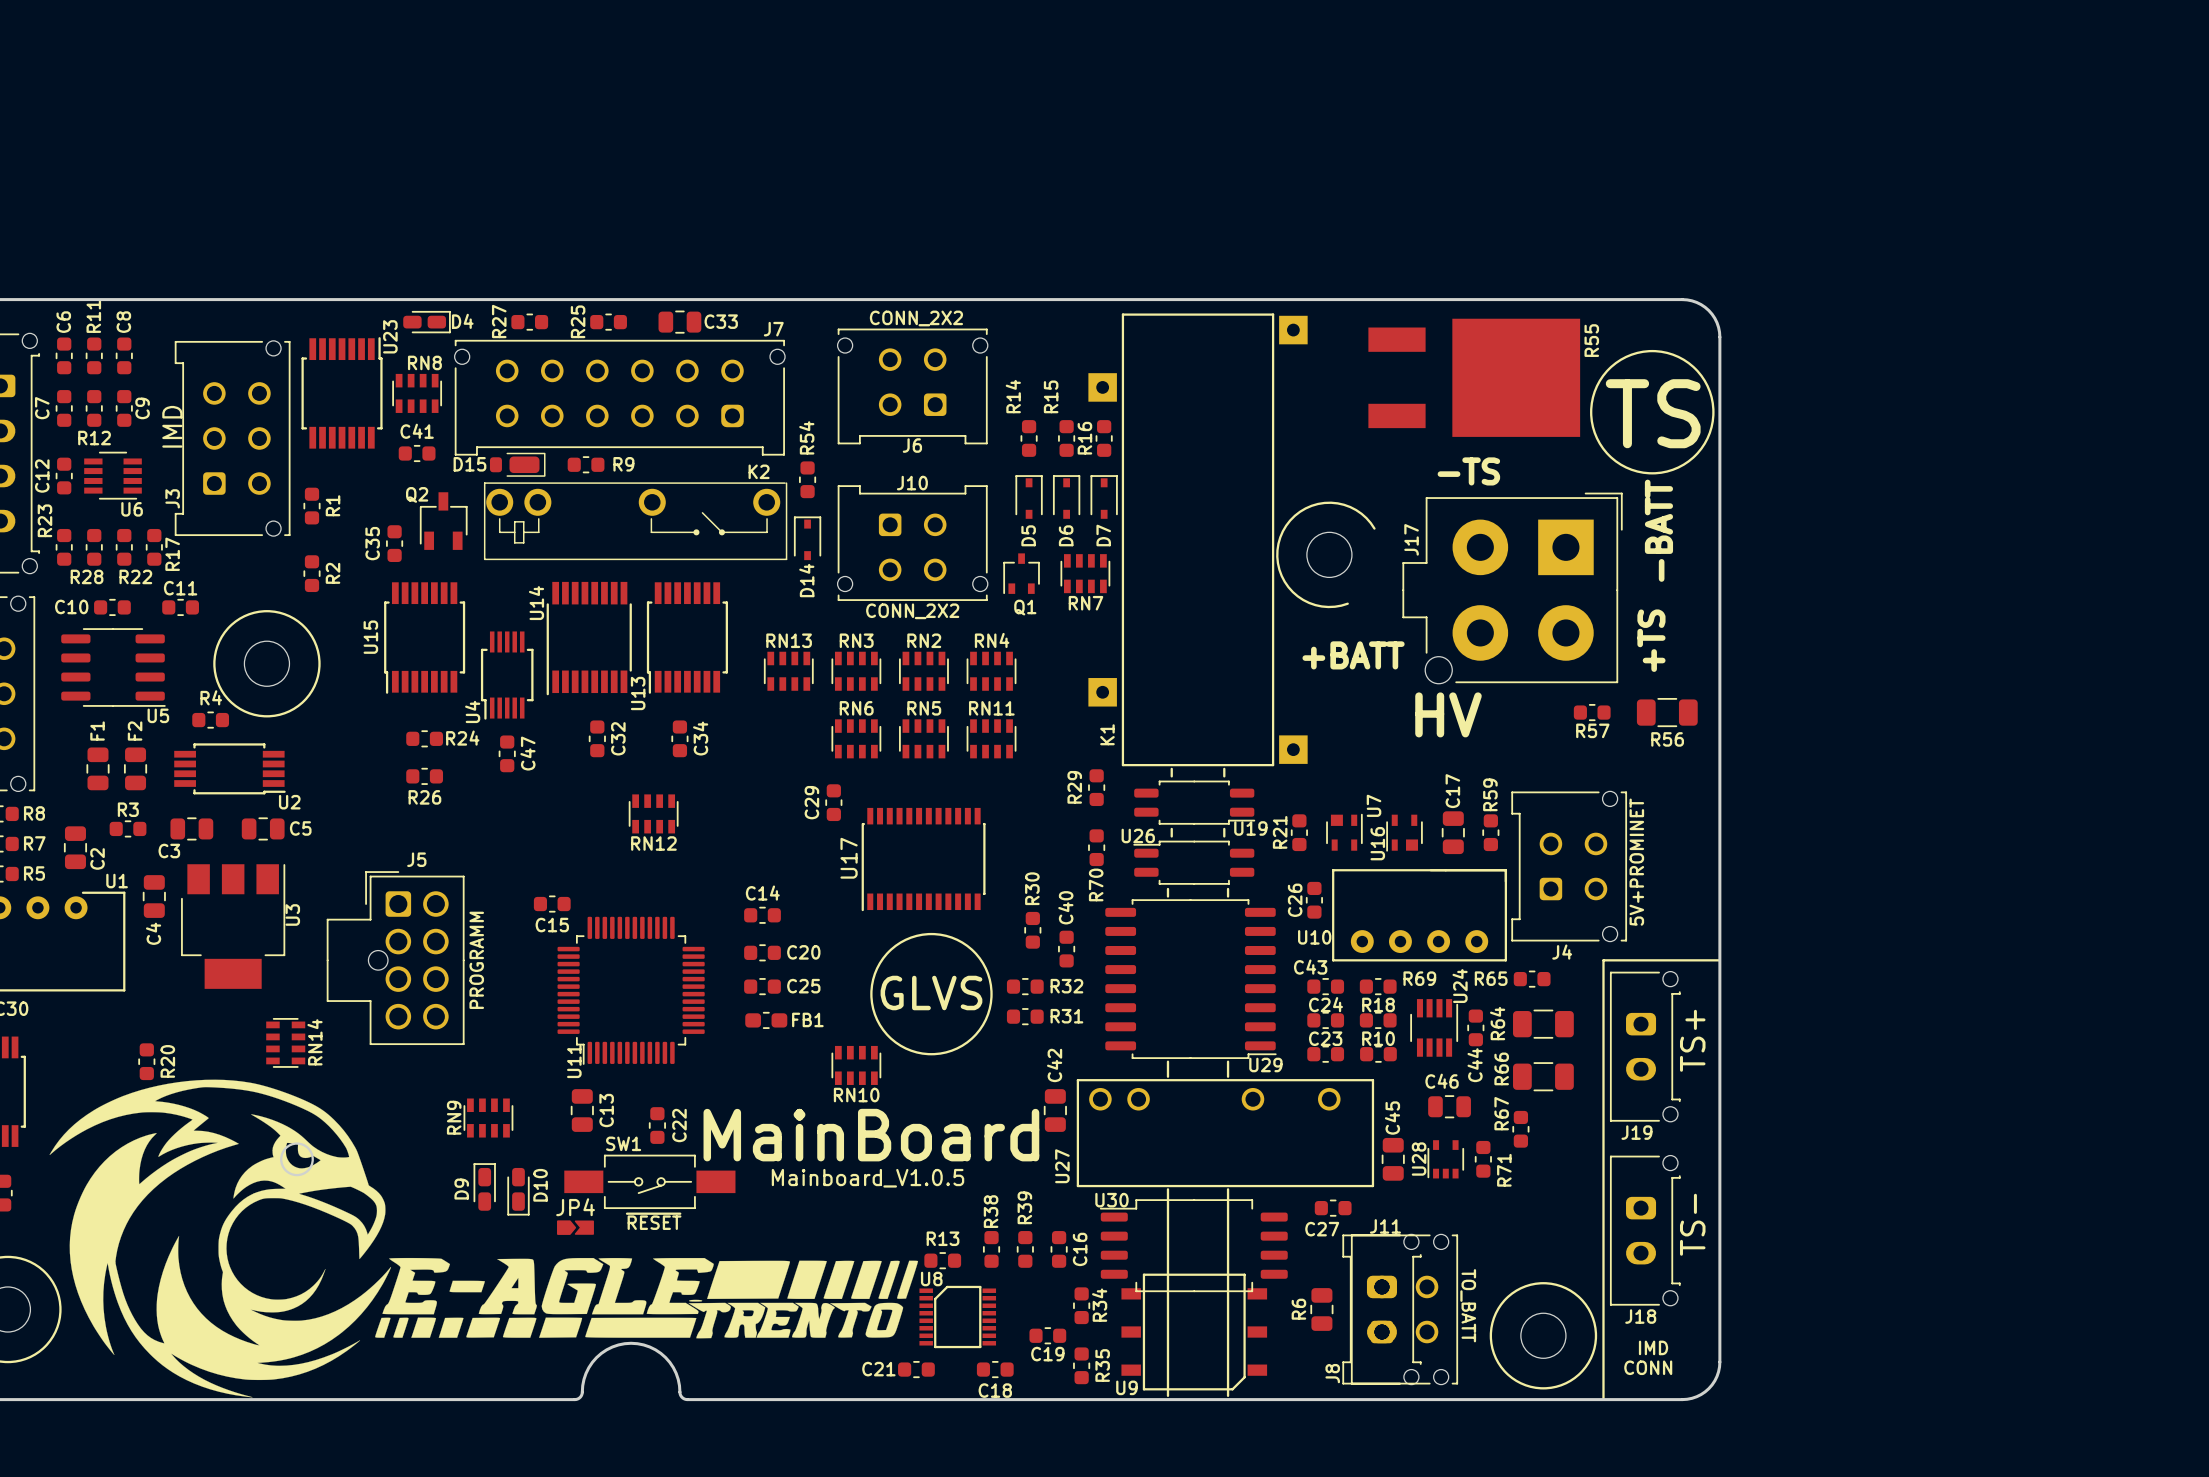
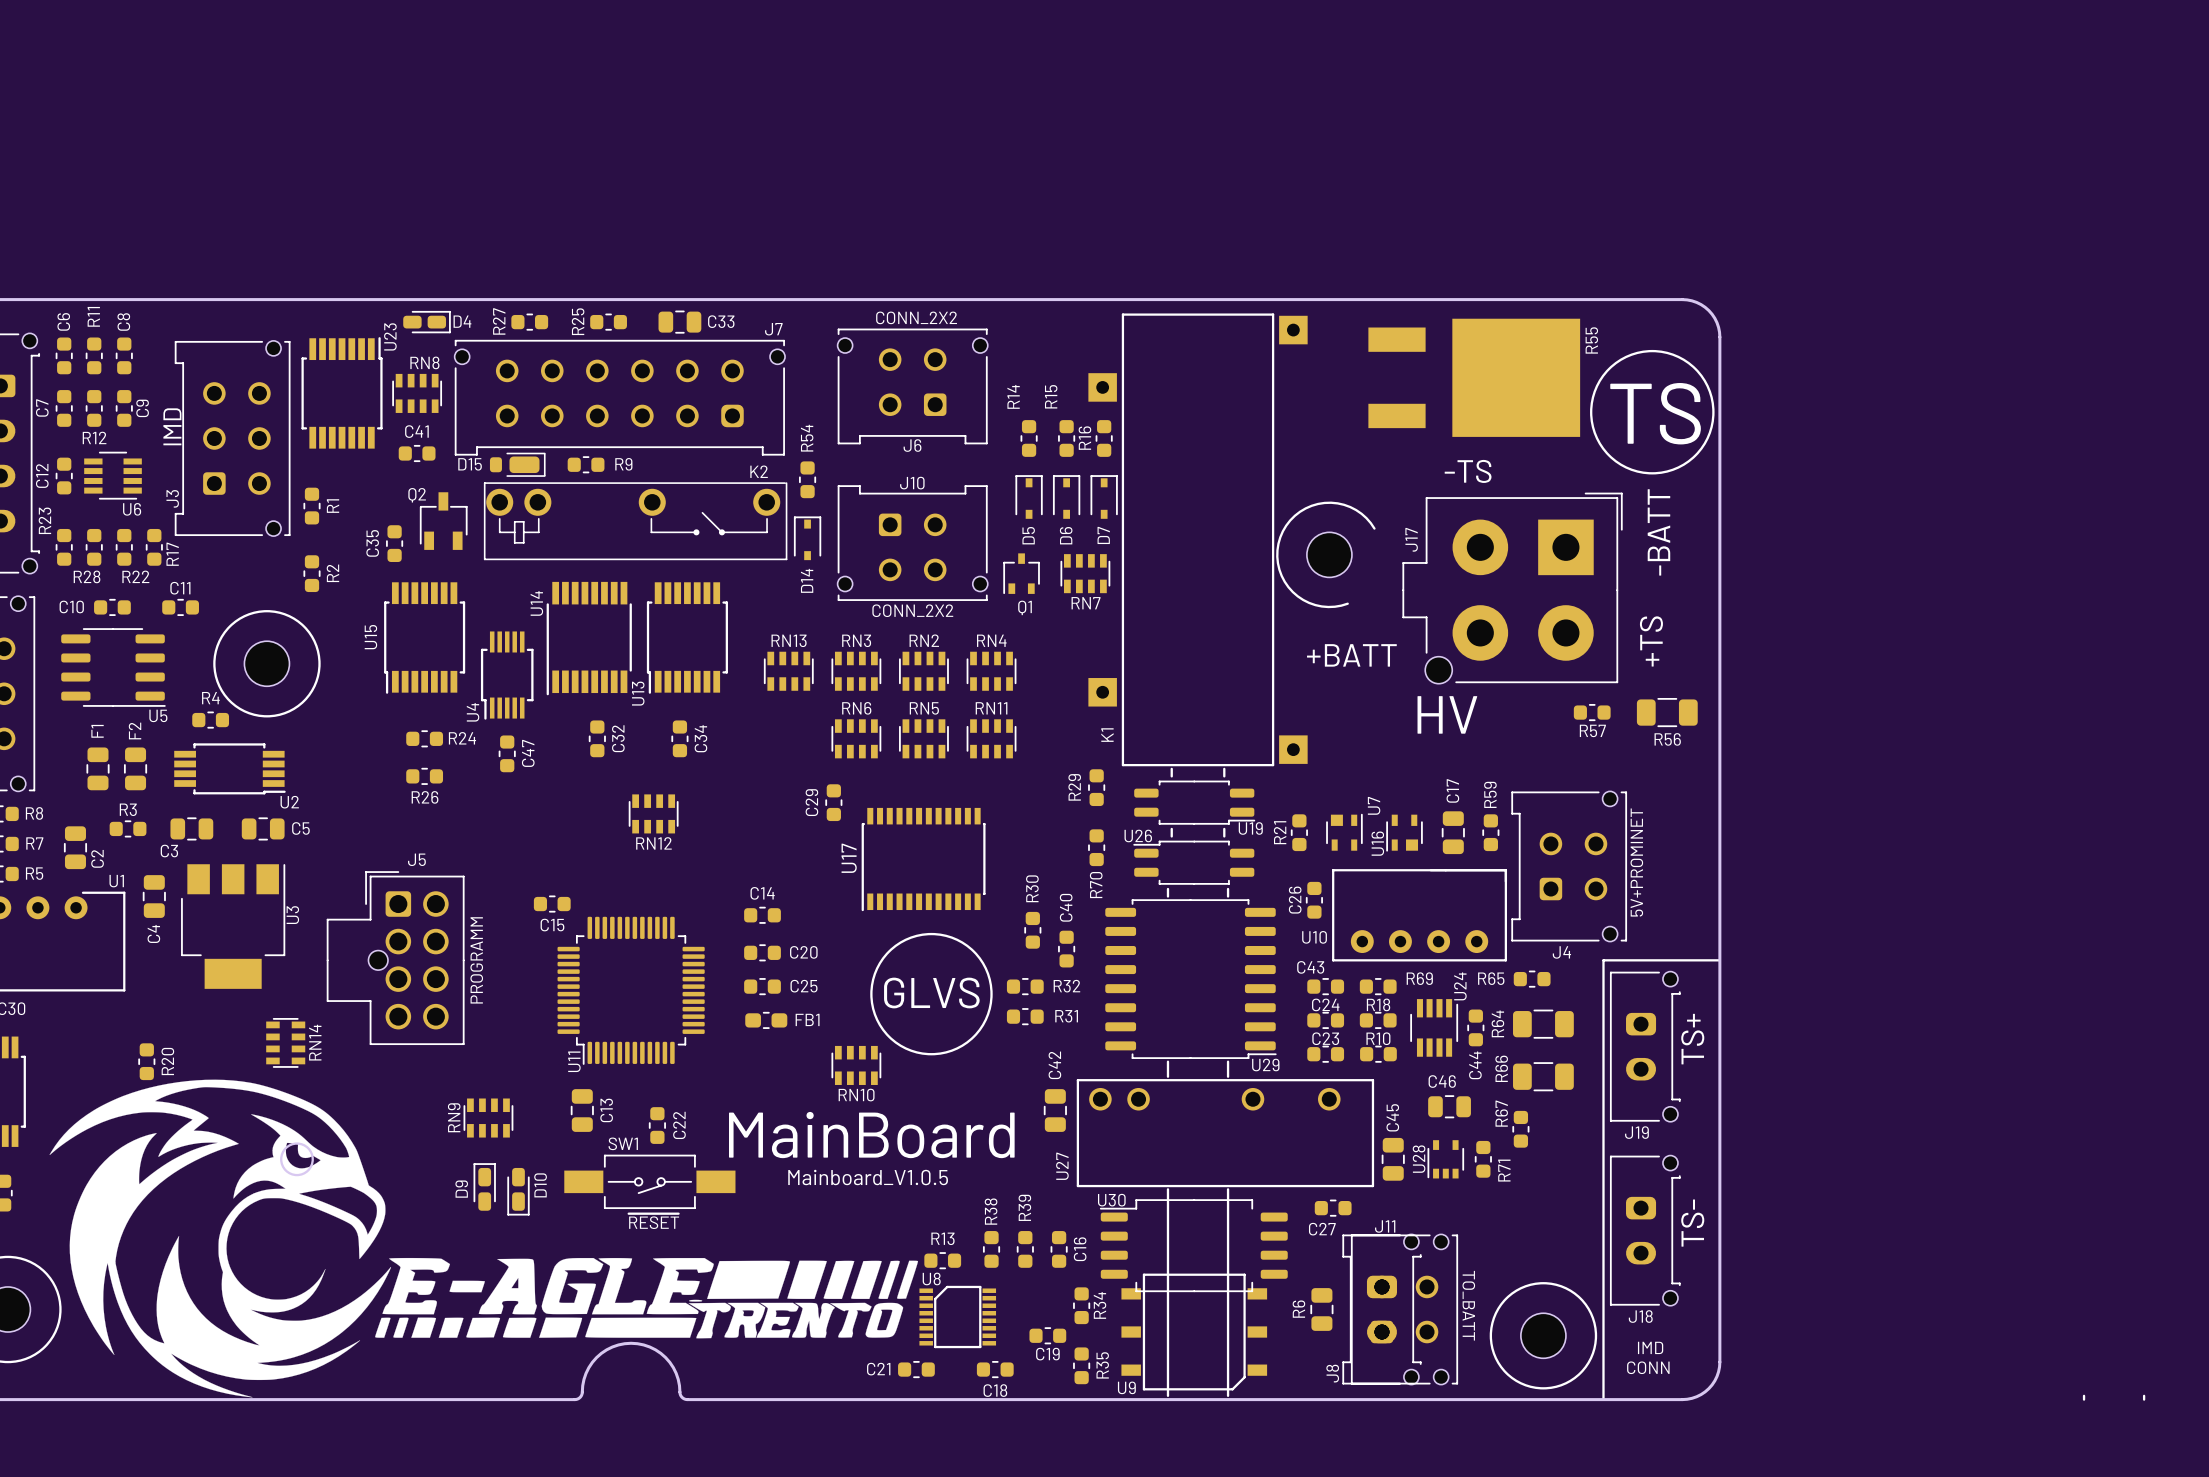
JP4: (575, 1227) -> none
line: none -> (2084, 1395) (2084, 1399)
line: none -> (2144, 1395) (2144, 1399)

